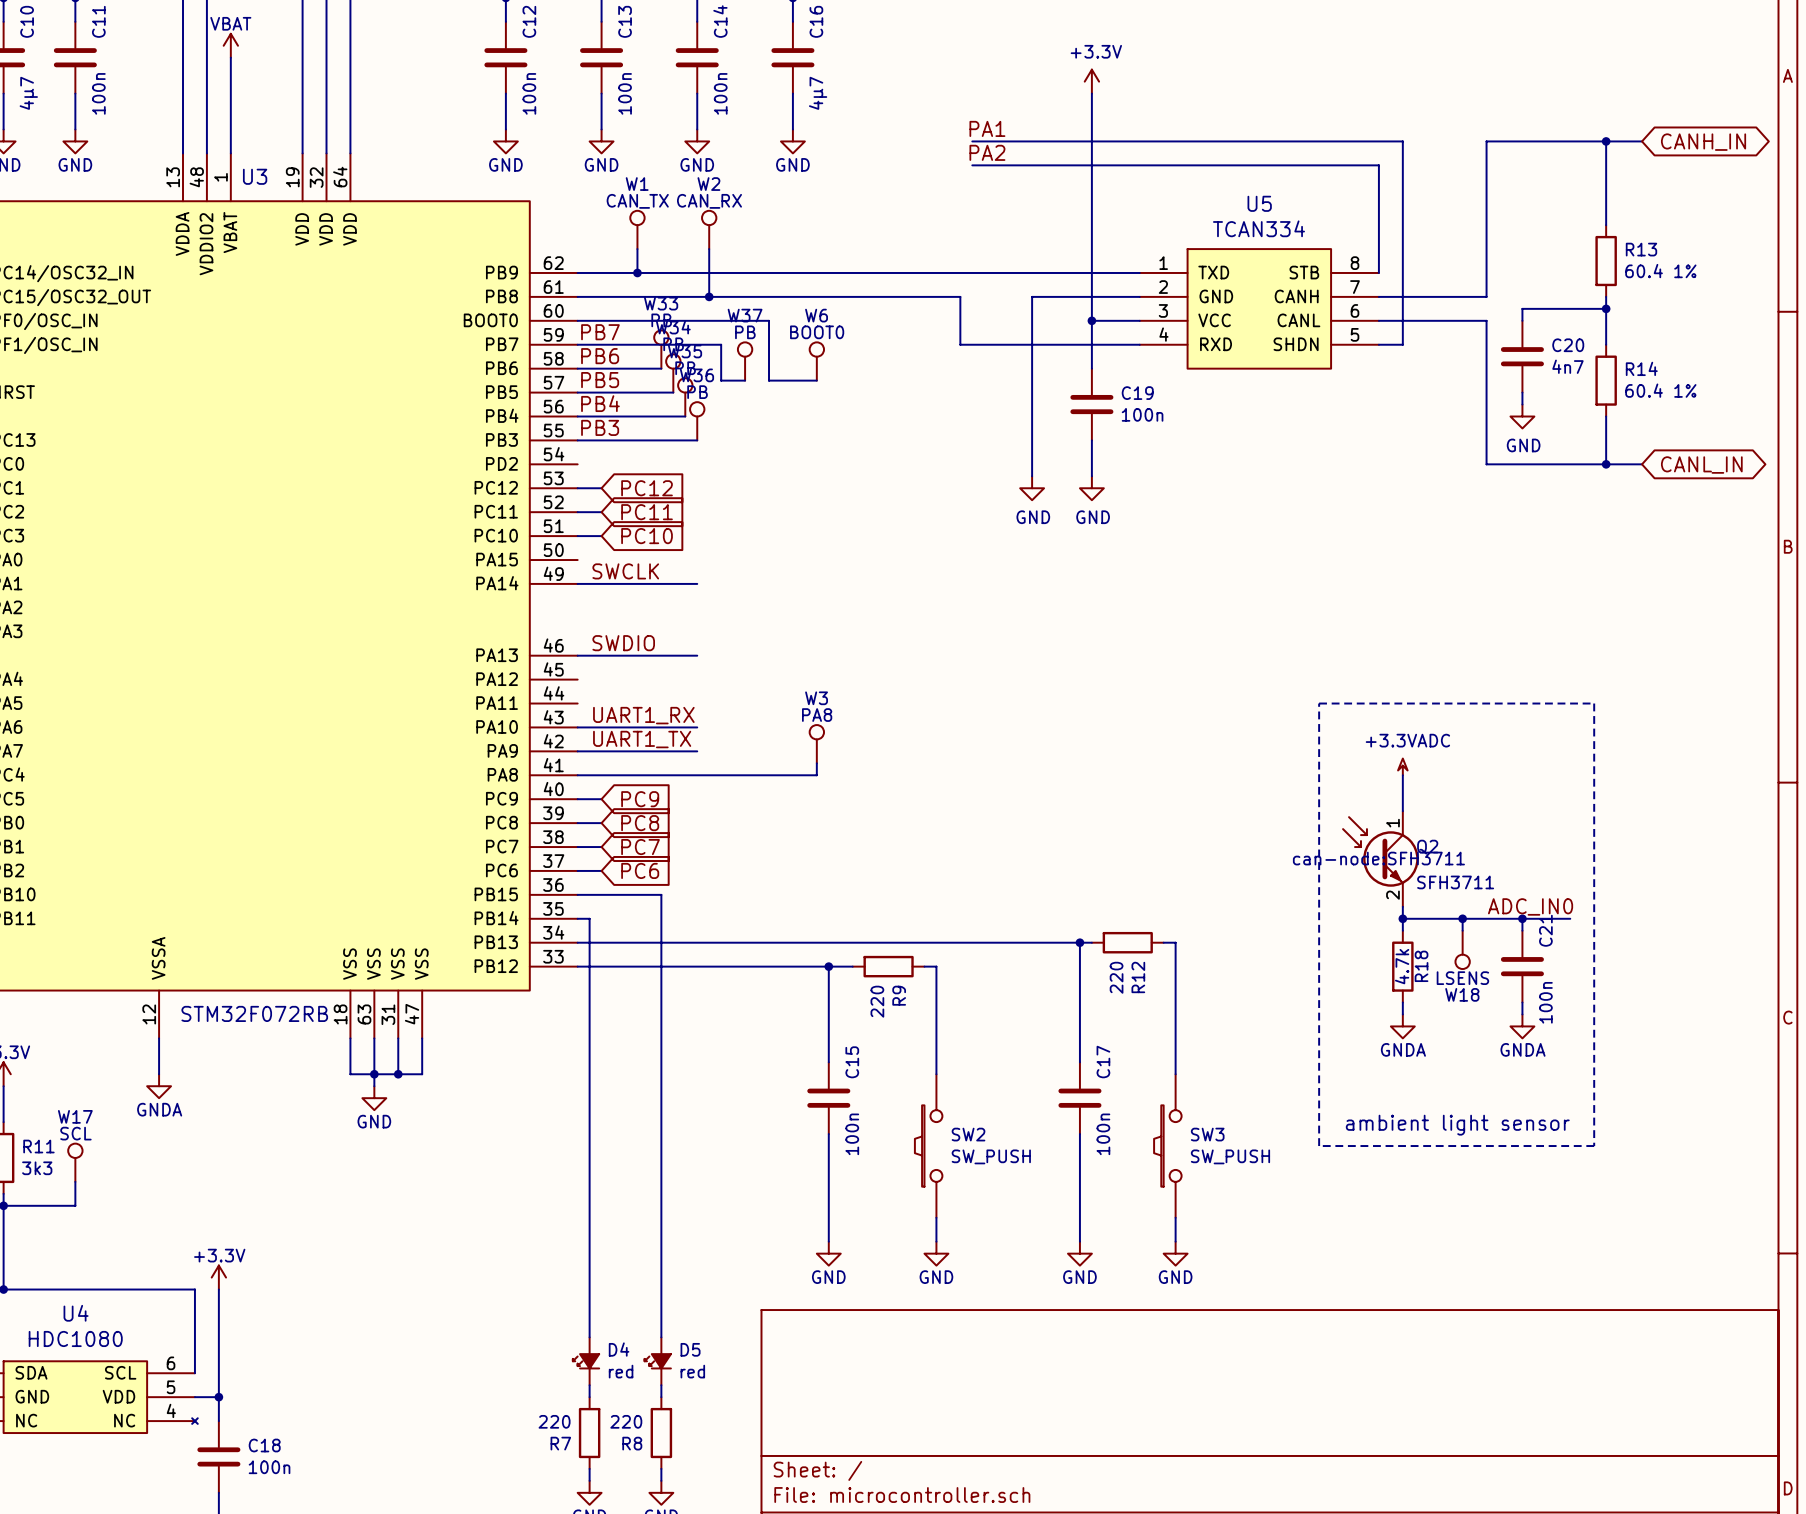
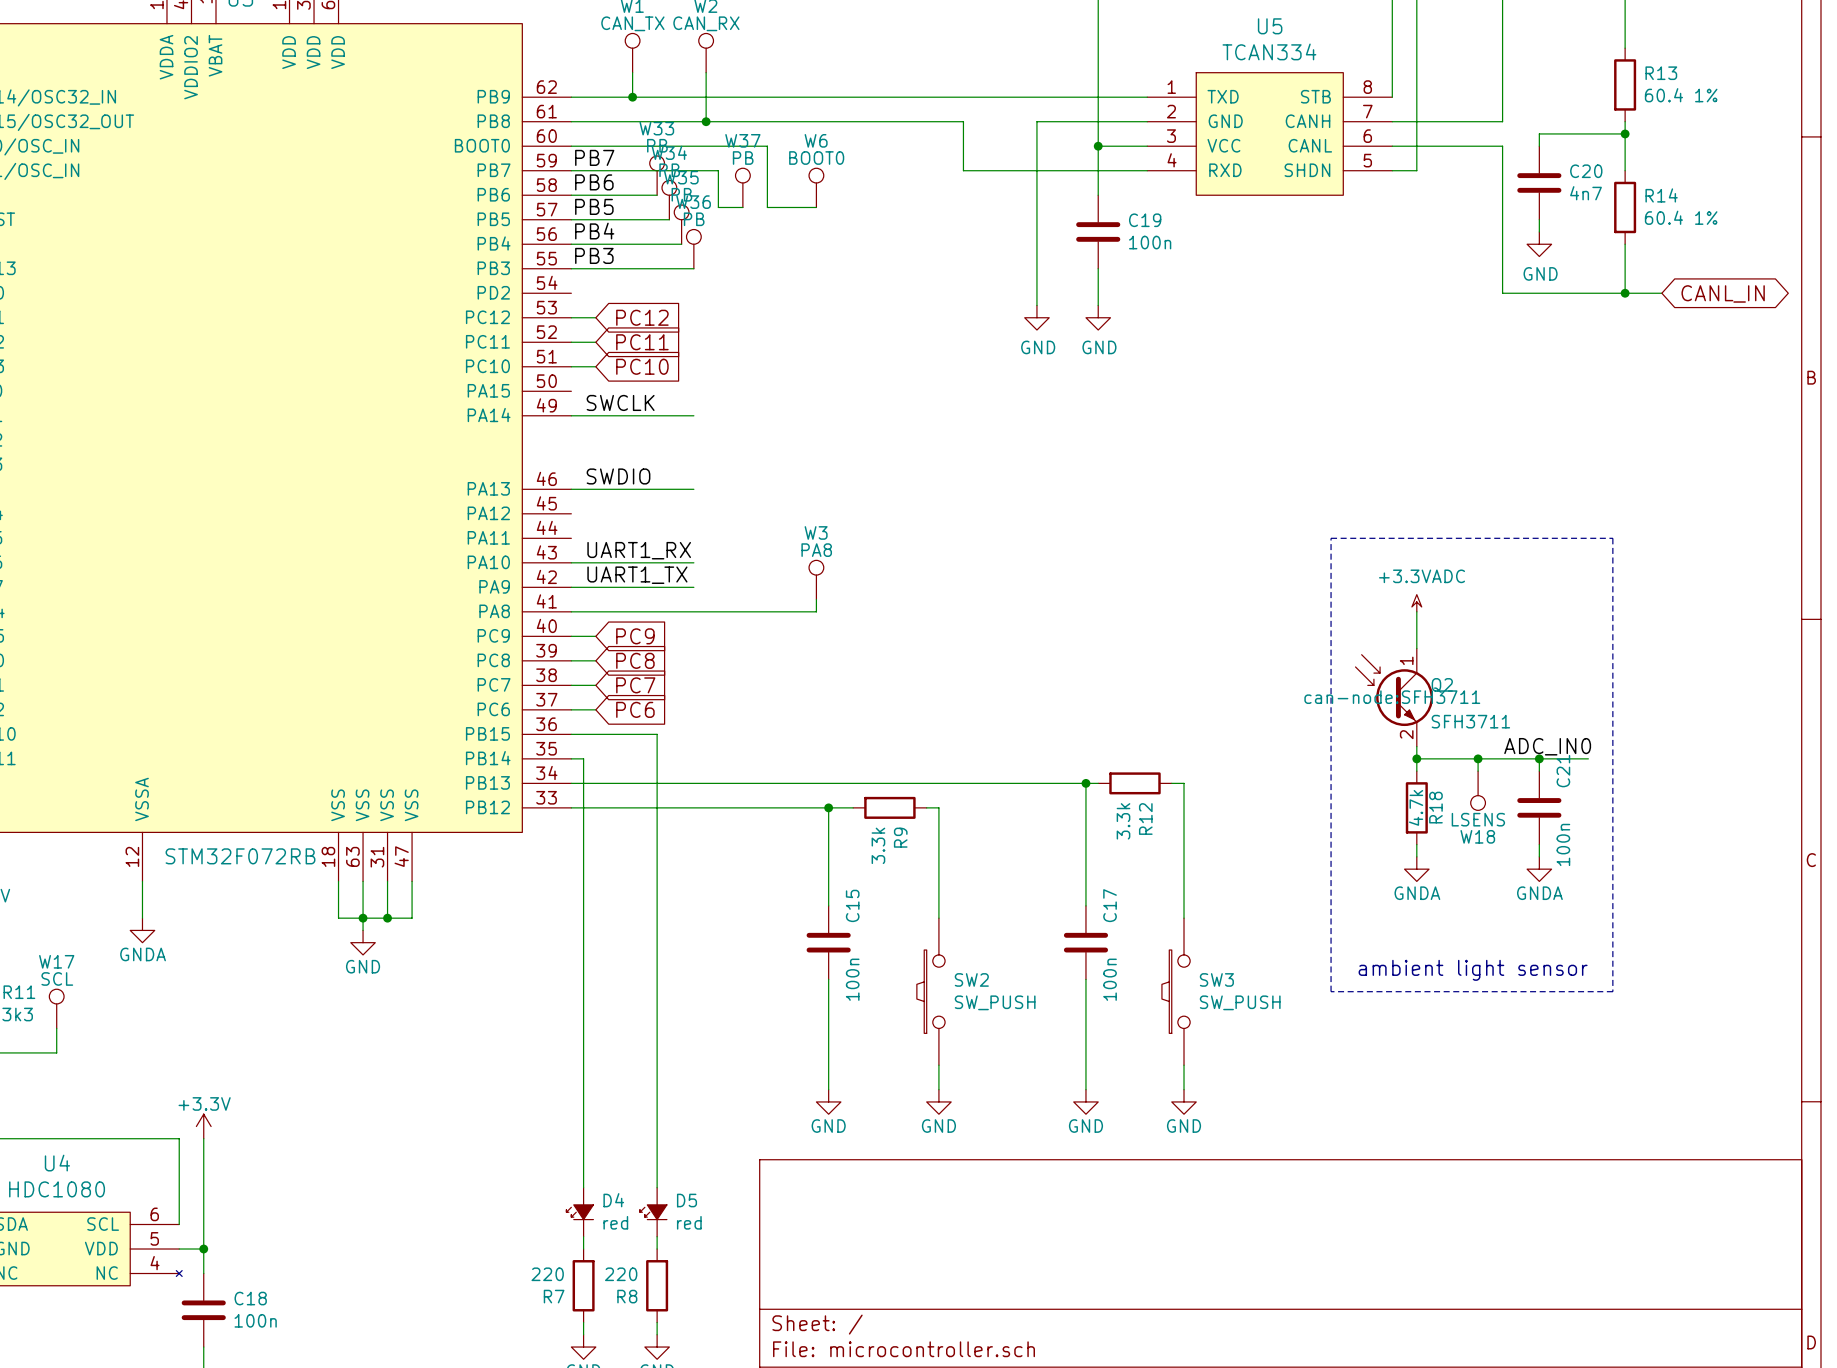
R12 value: 220 (1116, 977) -> 3.3k (1123, 821)
R9 value: 220 (877, 1001) -> 3.3k (878, 845)

